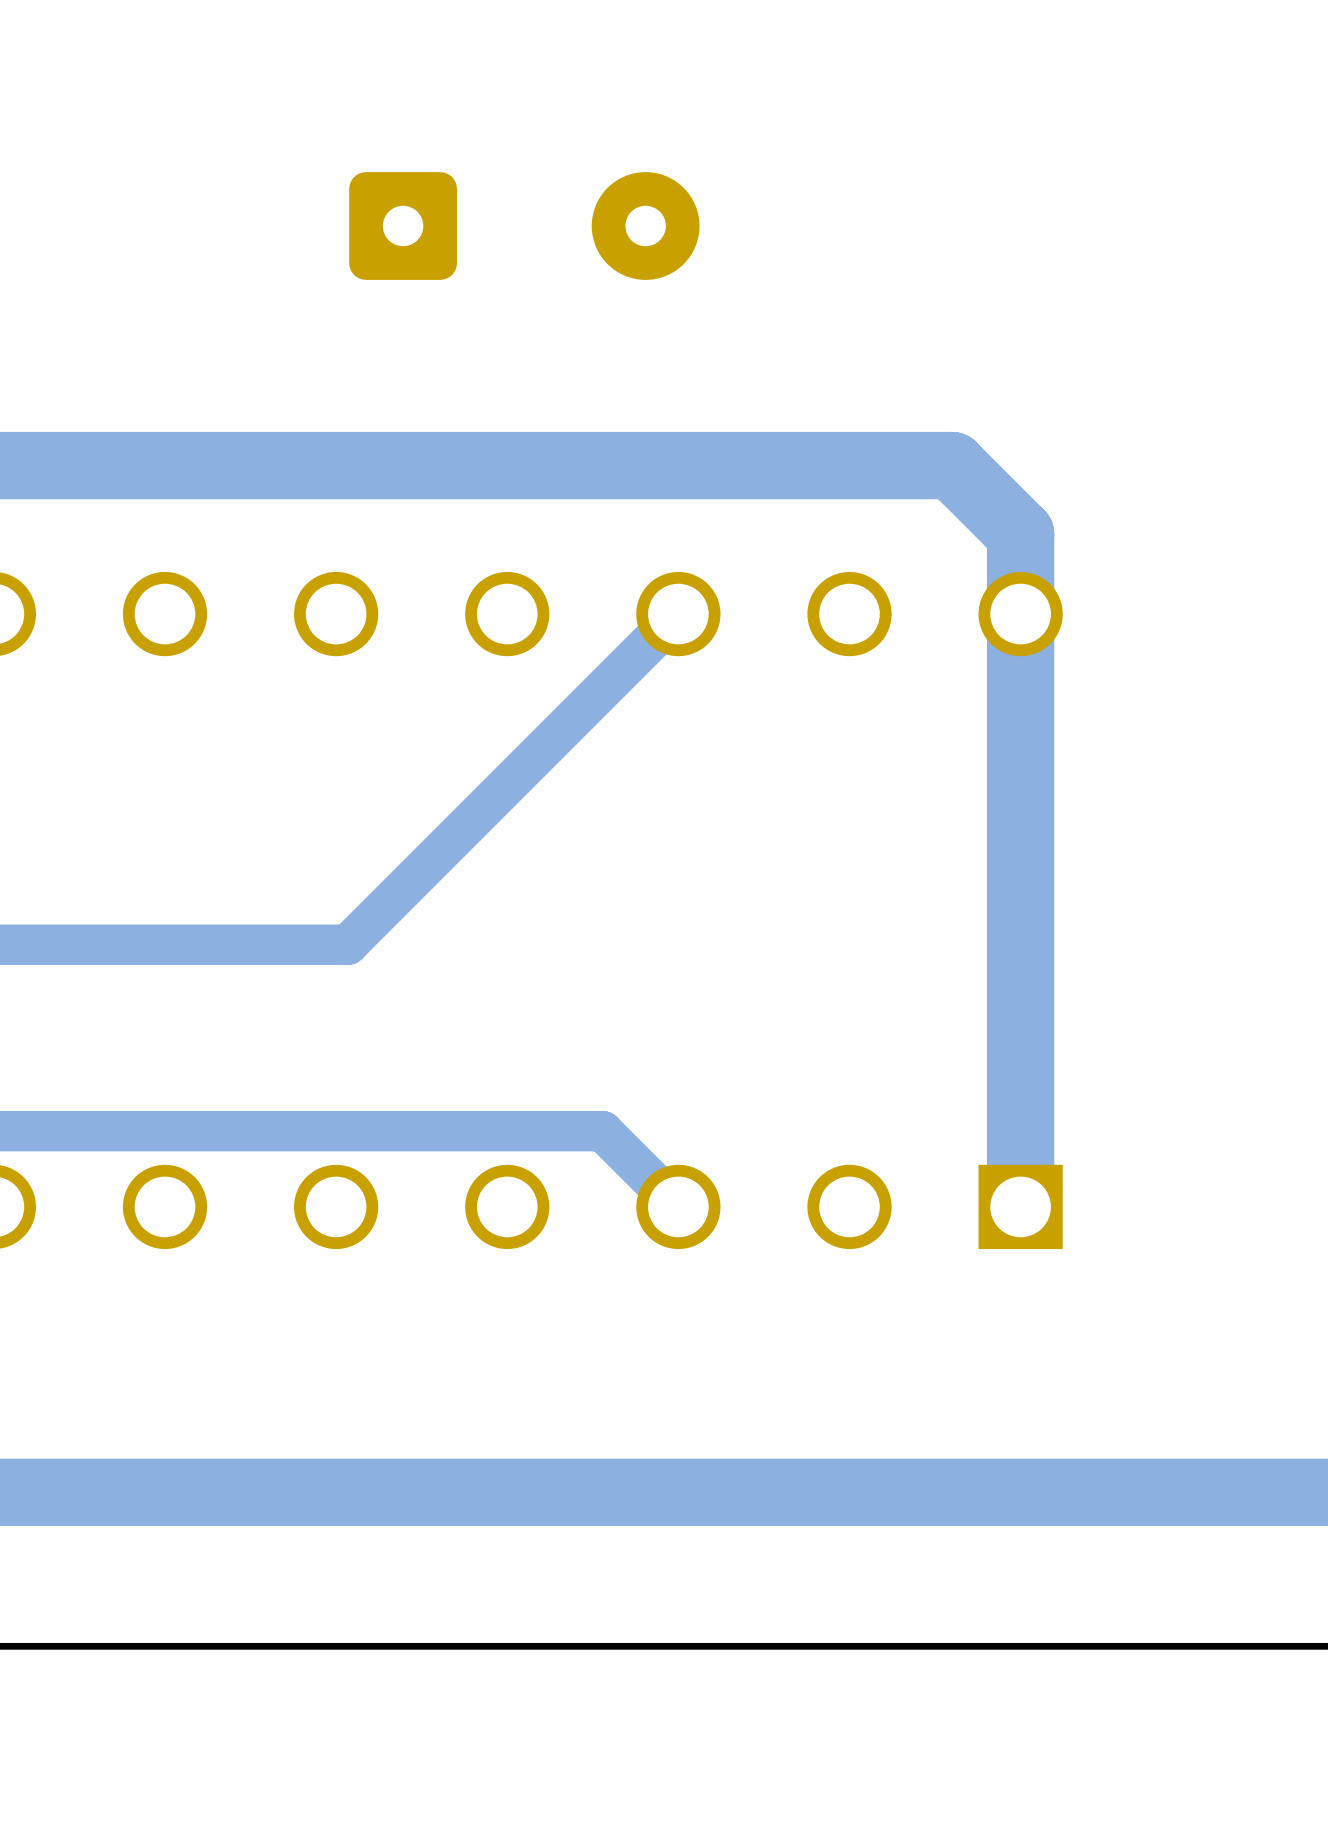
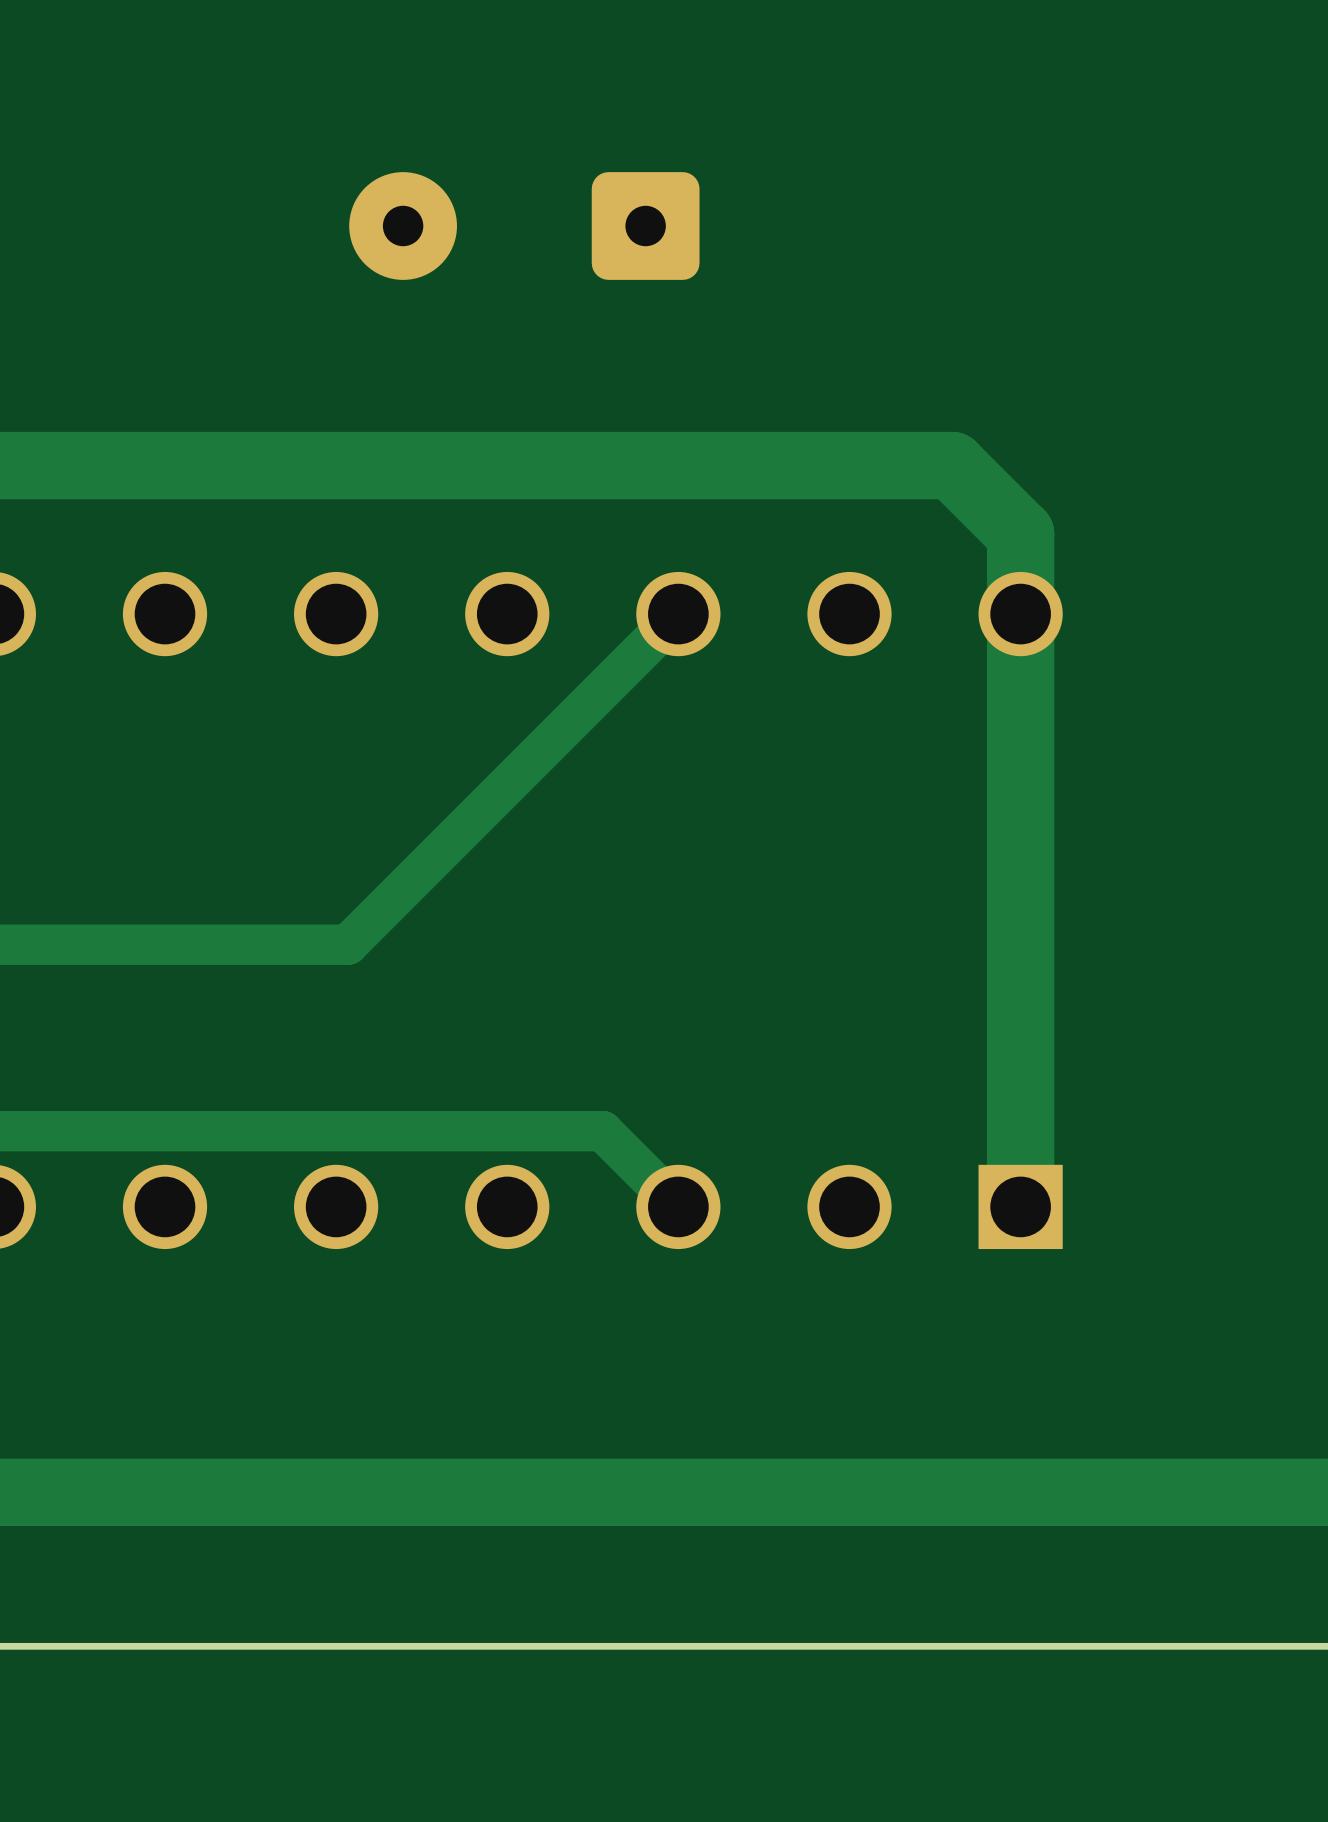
part rotation: 0° (524, 226) -> 180° (524, 226)

